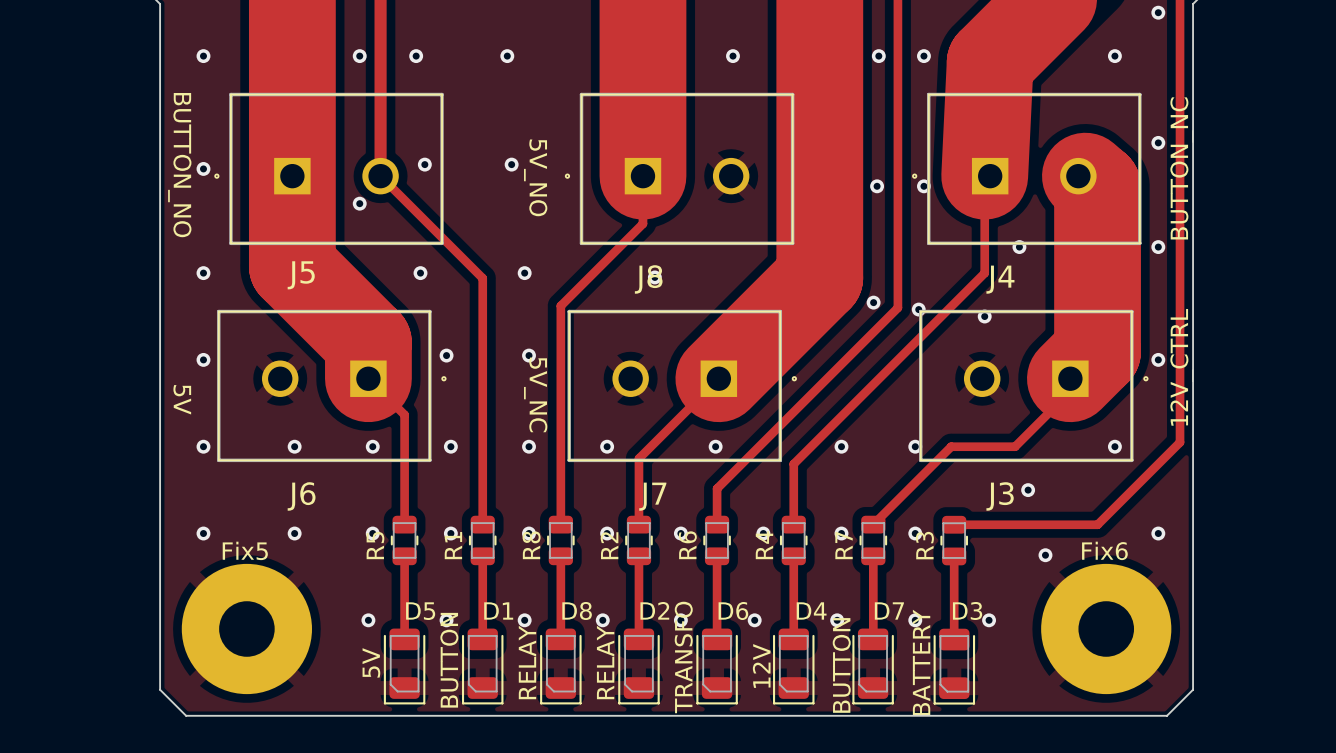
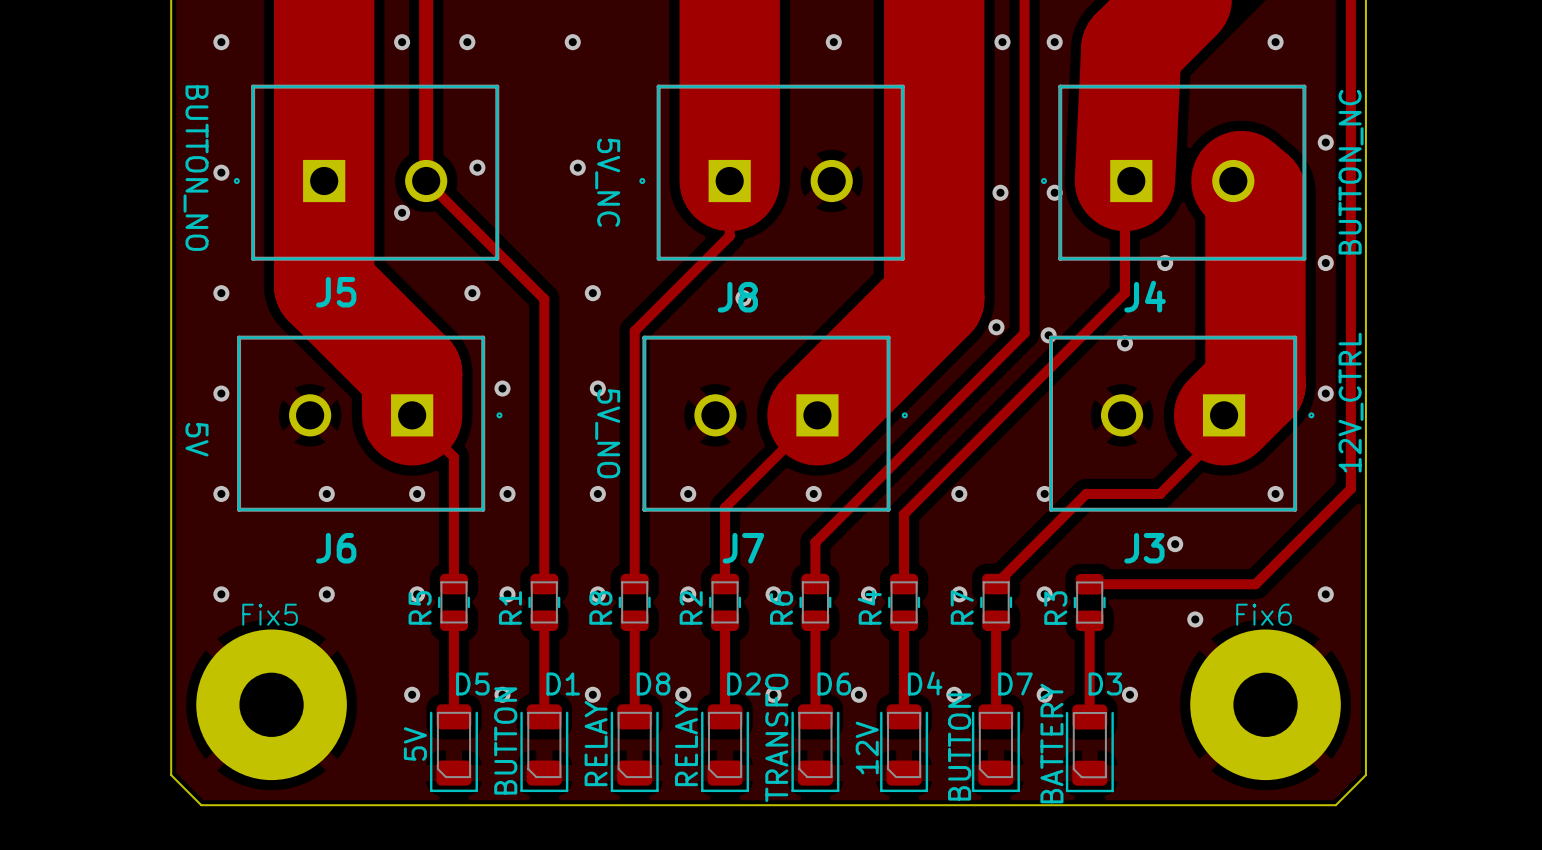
J8 text: 5V_NO (535, 177) -> 5V_NC (607, 182)
J7 text: 5V_NC (535, 394) -> 5V_NO (607, 433)

